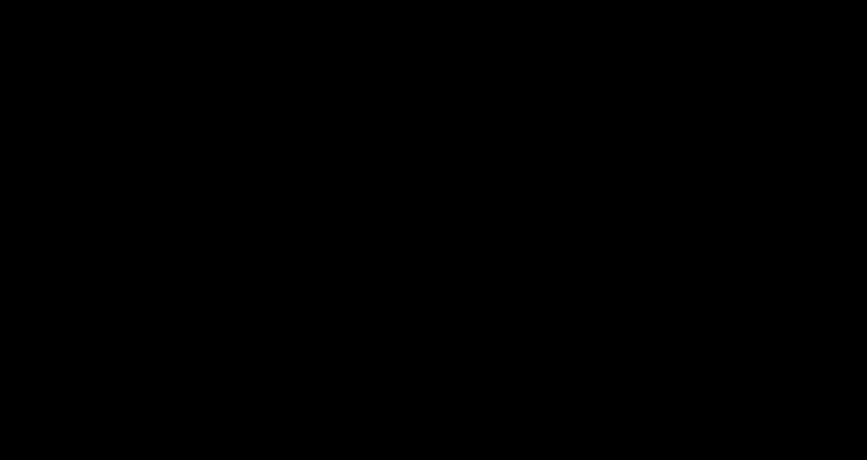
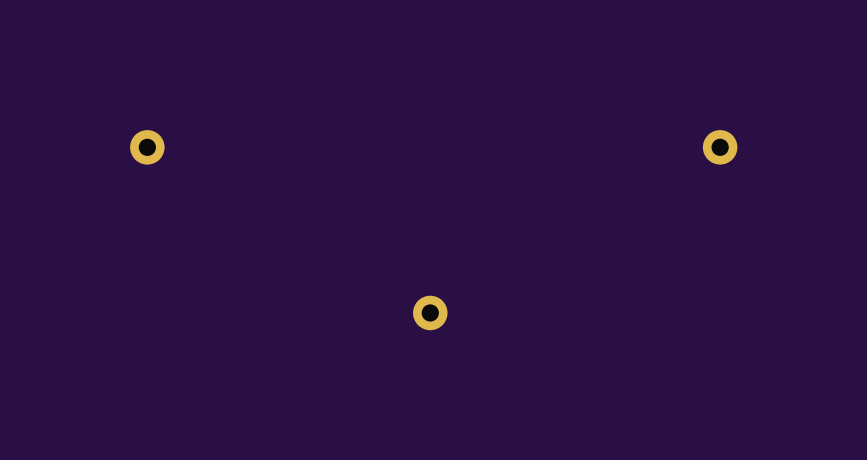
part: none -> (147, 147)
part: none -> (720, 147)
part: none -> (430, 312)

